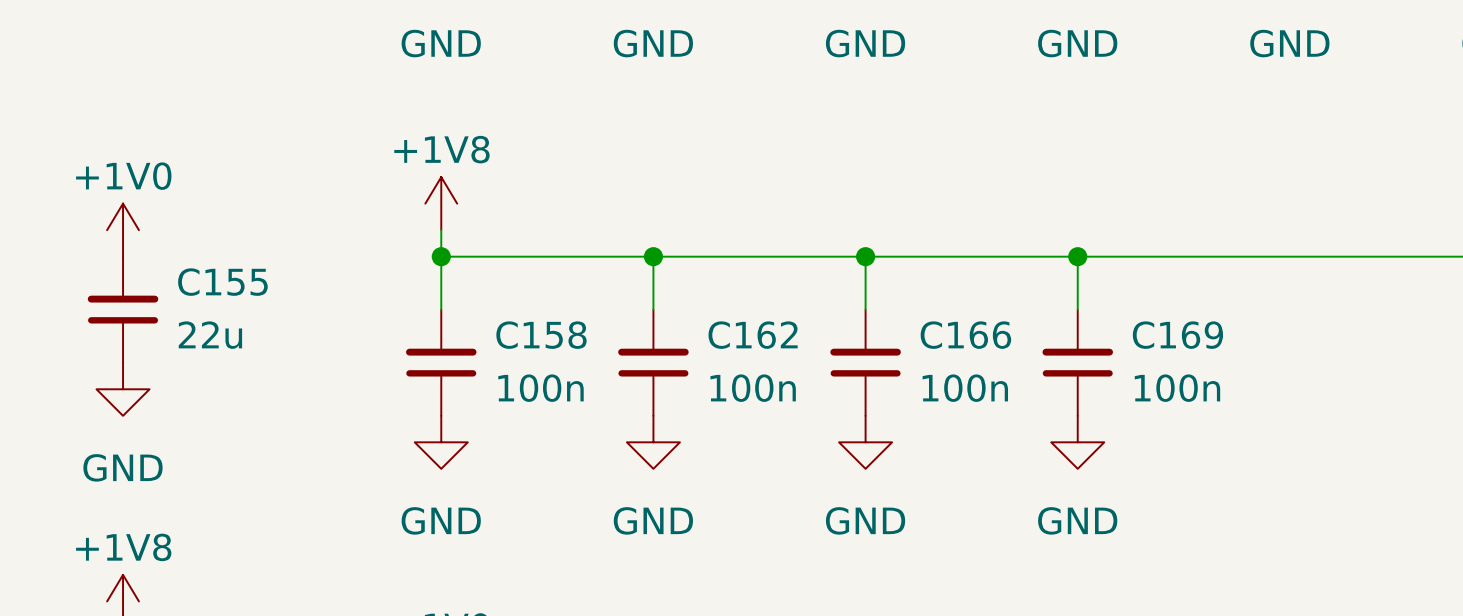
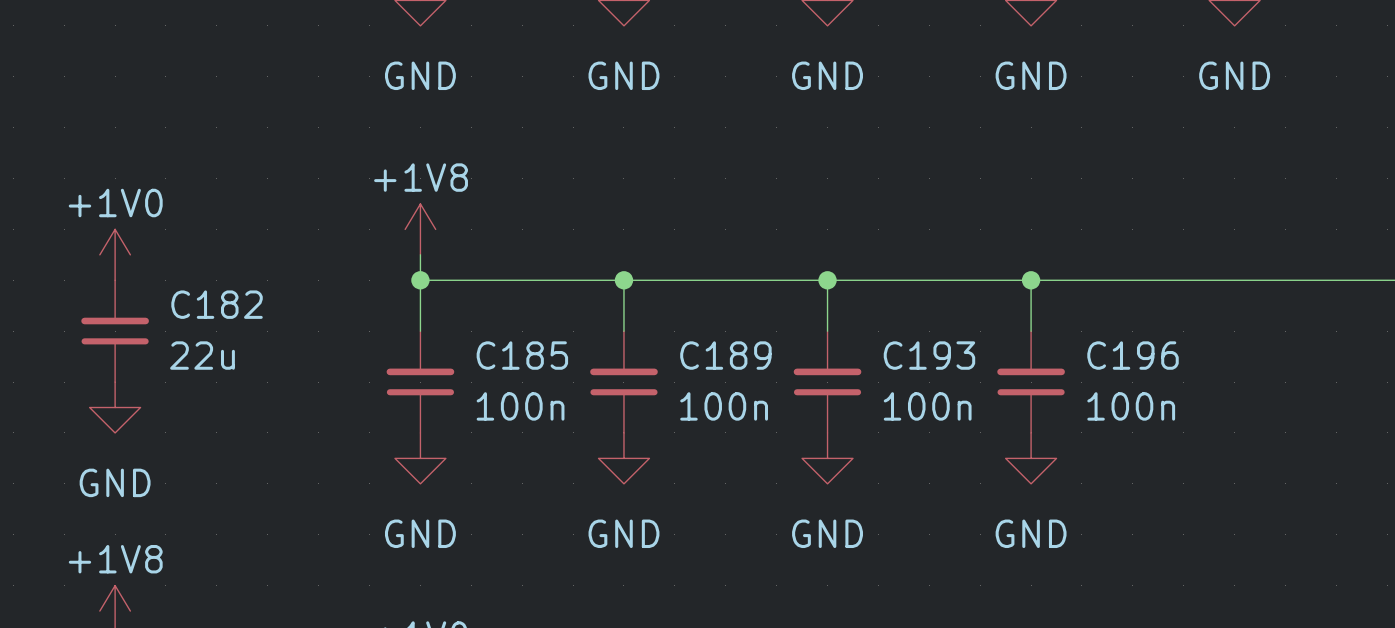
C155 name: C155 (222, 282) -> C182 (217, 304)
C158 name: C158 (541, 335) -> C185 (522, 355)
C162 name: C162 (753, 335) -> C189 (725, 355)
C166 name: C166 (965, 335) -> C193 (929, 355)
C169 name: C169 (1177, 335) -> C196 (1133, 355)

